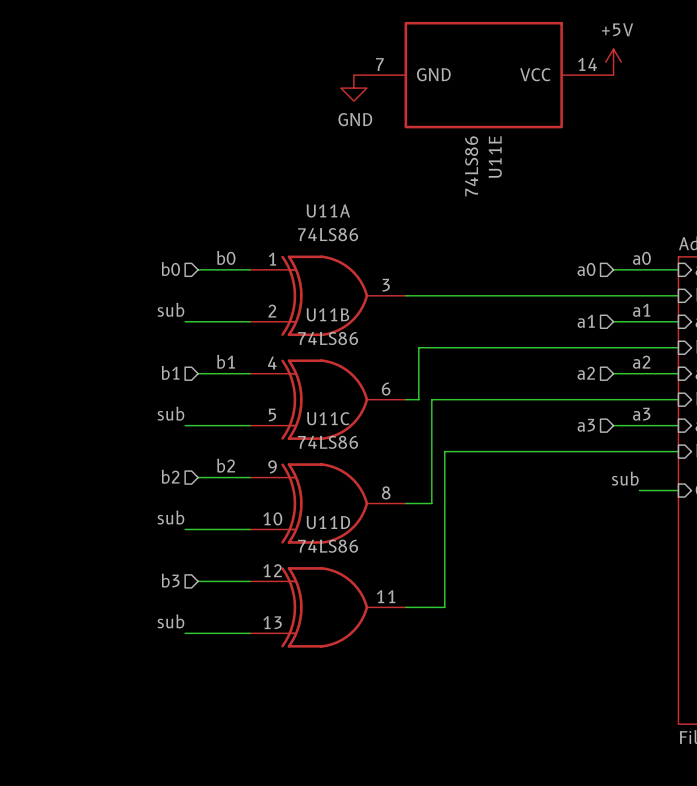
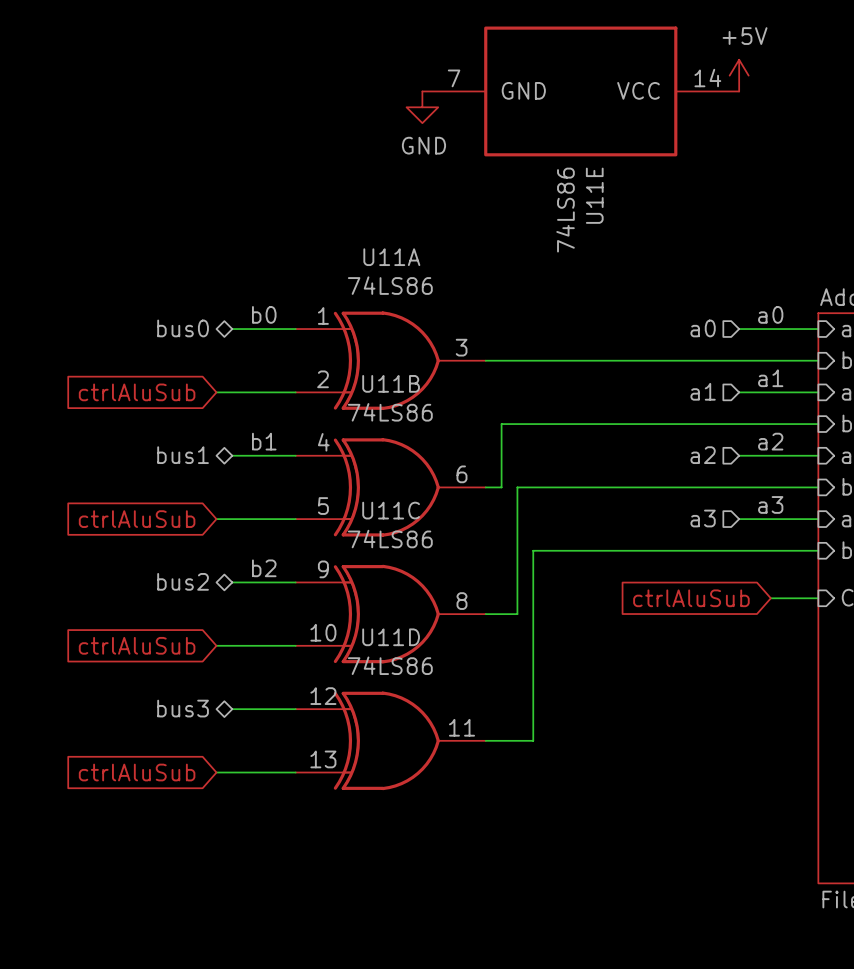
hierarchical label shape: input (170, 269) -> bidirectional (183, 328)
hierarchical label: b0 (170, 269) -> bus0 (183, 328)
label: sub (170, 309) -> none
global label: none -> ctrlAluSub (137, 392)
hierarchical label shape: input (170, 372) -> bidirectional (183, 455)
hierarchical label: b1 (170, 372) -> bus1 (183, 455)
label: sub (170, 413) -> none
global label: none -> ctrlAluSub (137, 519)
hierarchical label shape: input (170, 476) -> bidirectional (183, 581)
hierarchical label: b2 (170, 476) -> bus2 (183, 581)
label: sub (625, 478) -> none
global label: none -> ctrlAluSub (691, 598)
label: sub (170, 517) -> none
global label: none -> ctrlAluSub (137, 645)
hierarchical label shape: input (170, 580) -> bidirectional (183, 708)
hierarchical label: b3 (170, 580) -> bus3 (183, 708)
label: sub (170, 621) -> none
global label: none -> ctrlAluSub (137, 772)

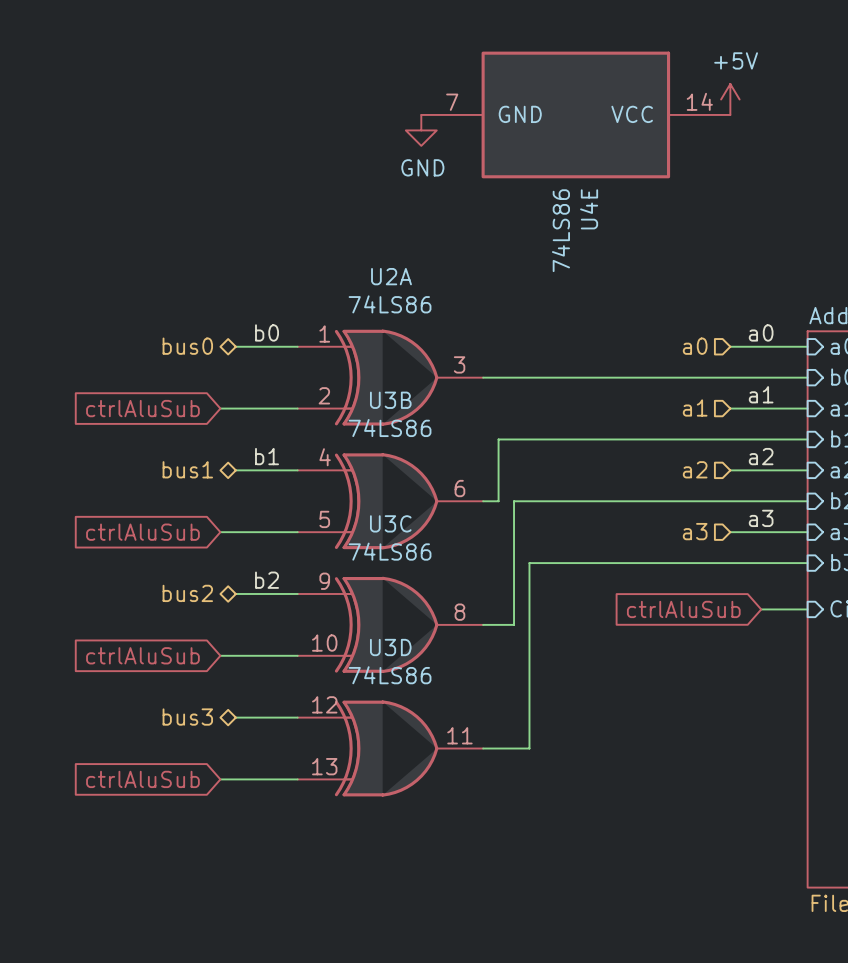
U11E name: U11E (594, 195) -> U4E (589, 209)
U11A name: U11A (391, 257) -> U2A (391, 276)
U11B name: U11B (391, 383) -> U3B (390, 400)
U11C name: U11C (391, 510) -> U3C (390, 523)
U11D name: U11D (391, 637) -> U3D (390, 647)

